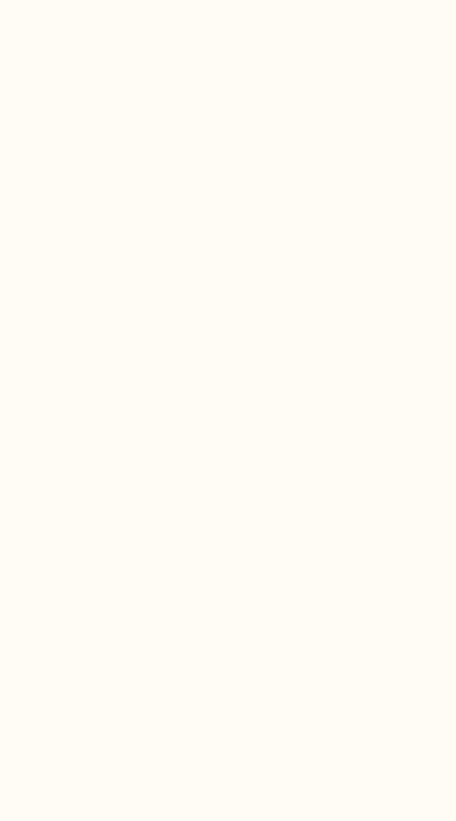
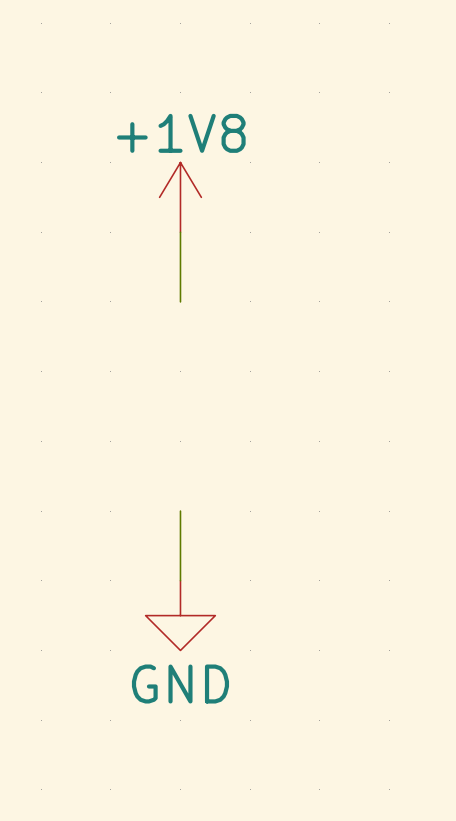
power symbol: none -> +1V8 (180, 197)
wire: none -> (180, 232) (180, 301)
wire: none -> (180, 511) (180, 580)
power symbol: none -> GND (180, 615)

